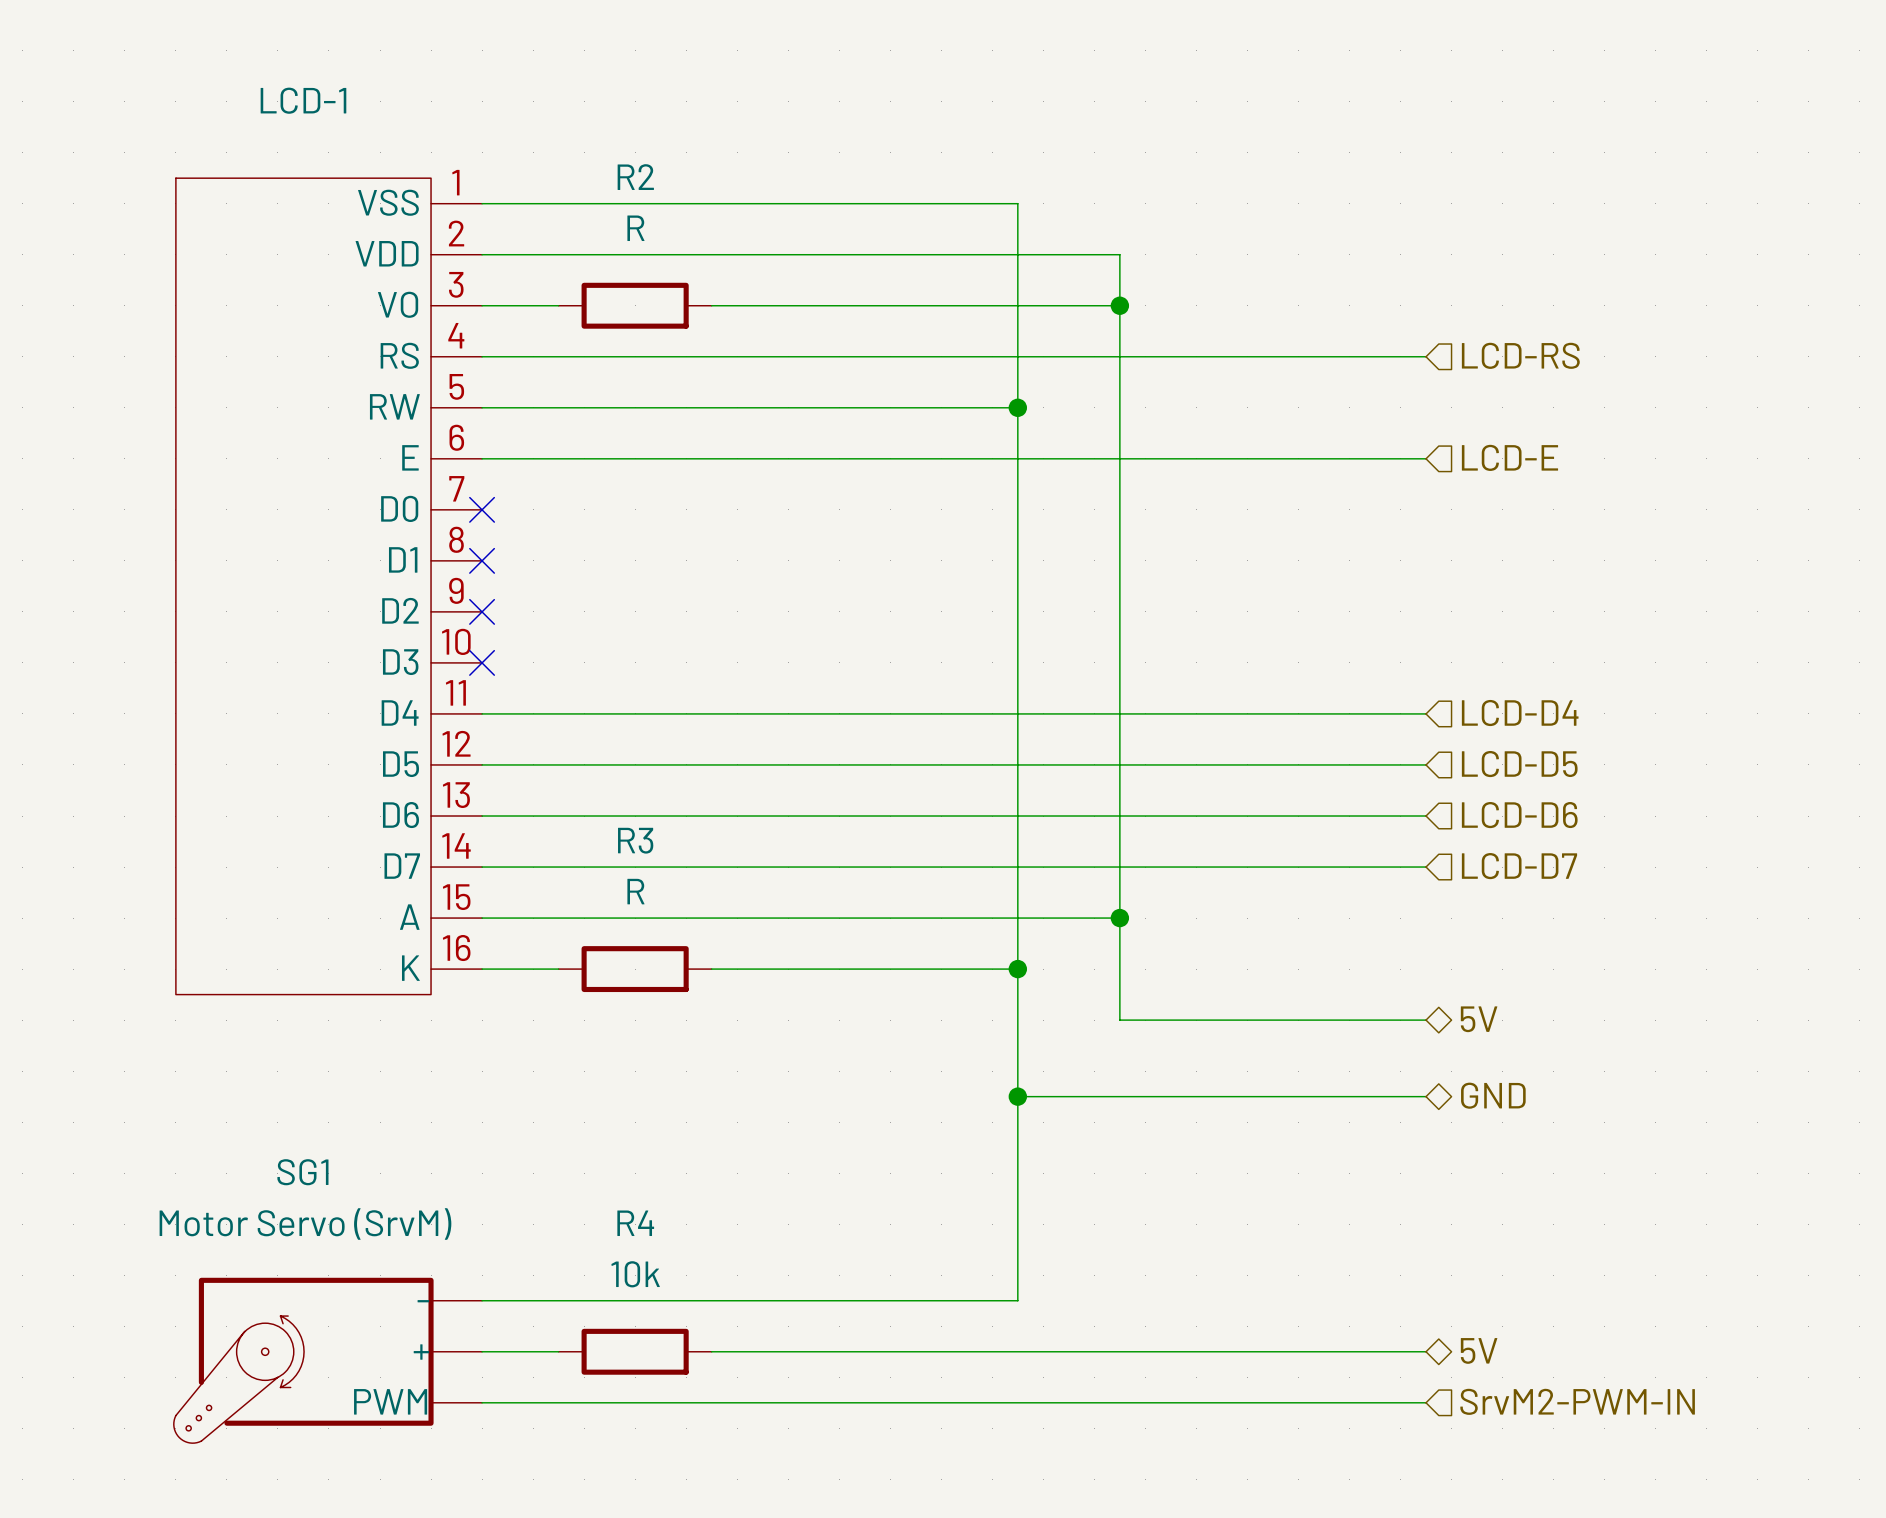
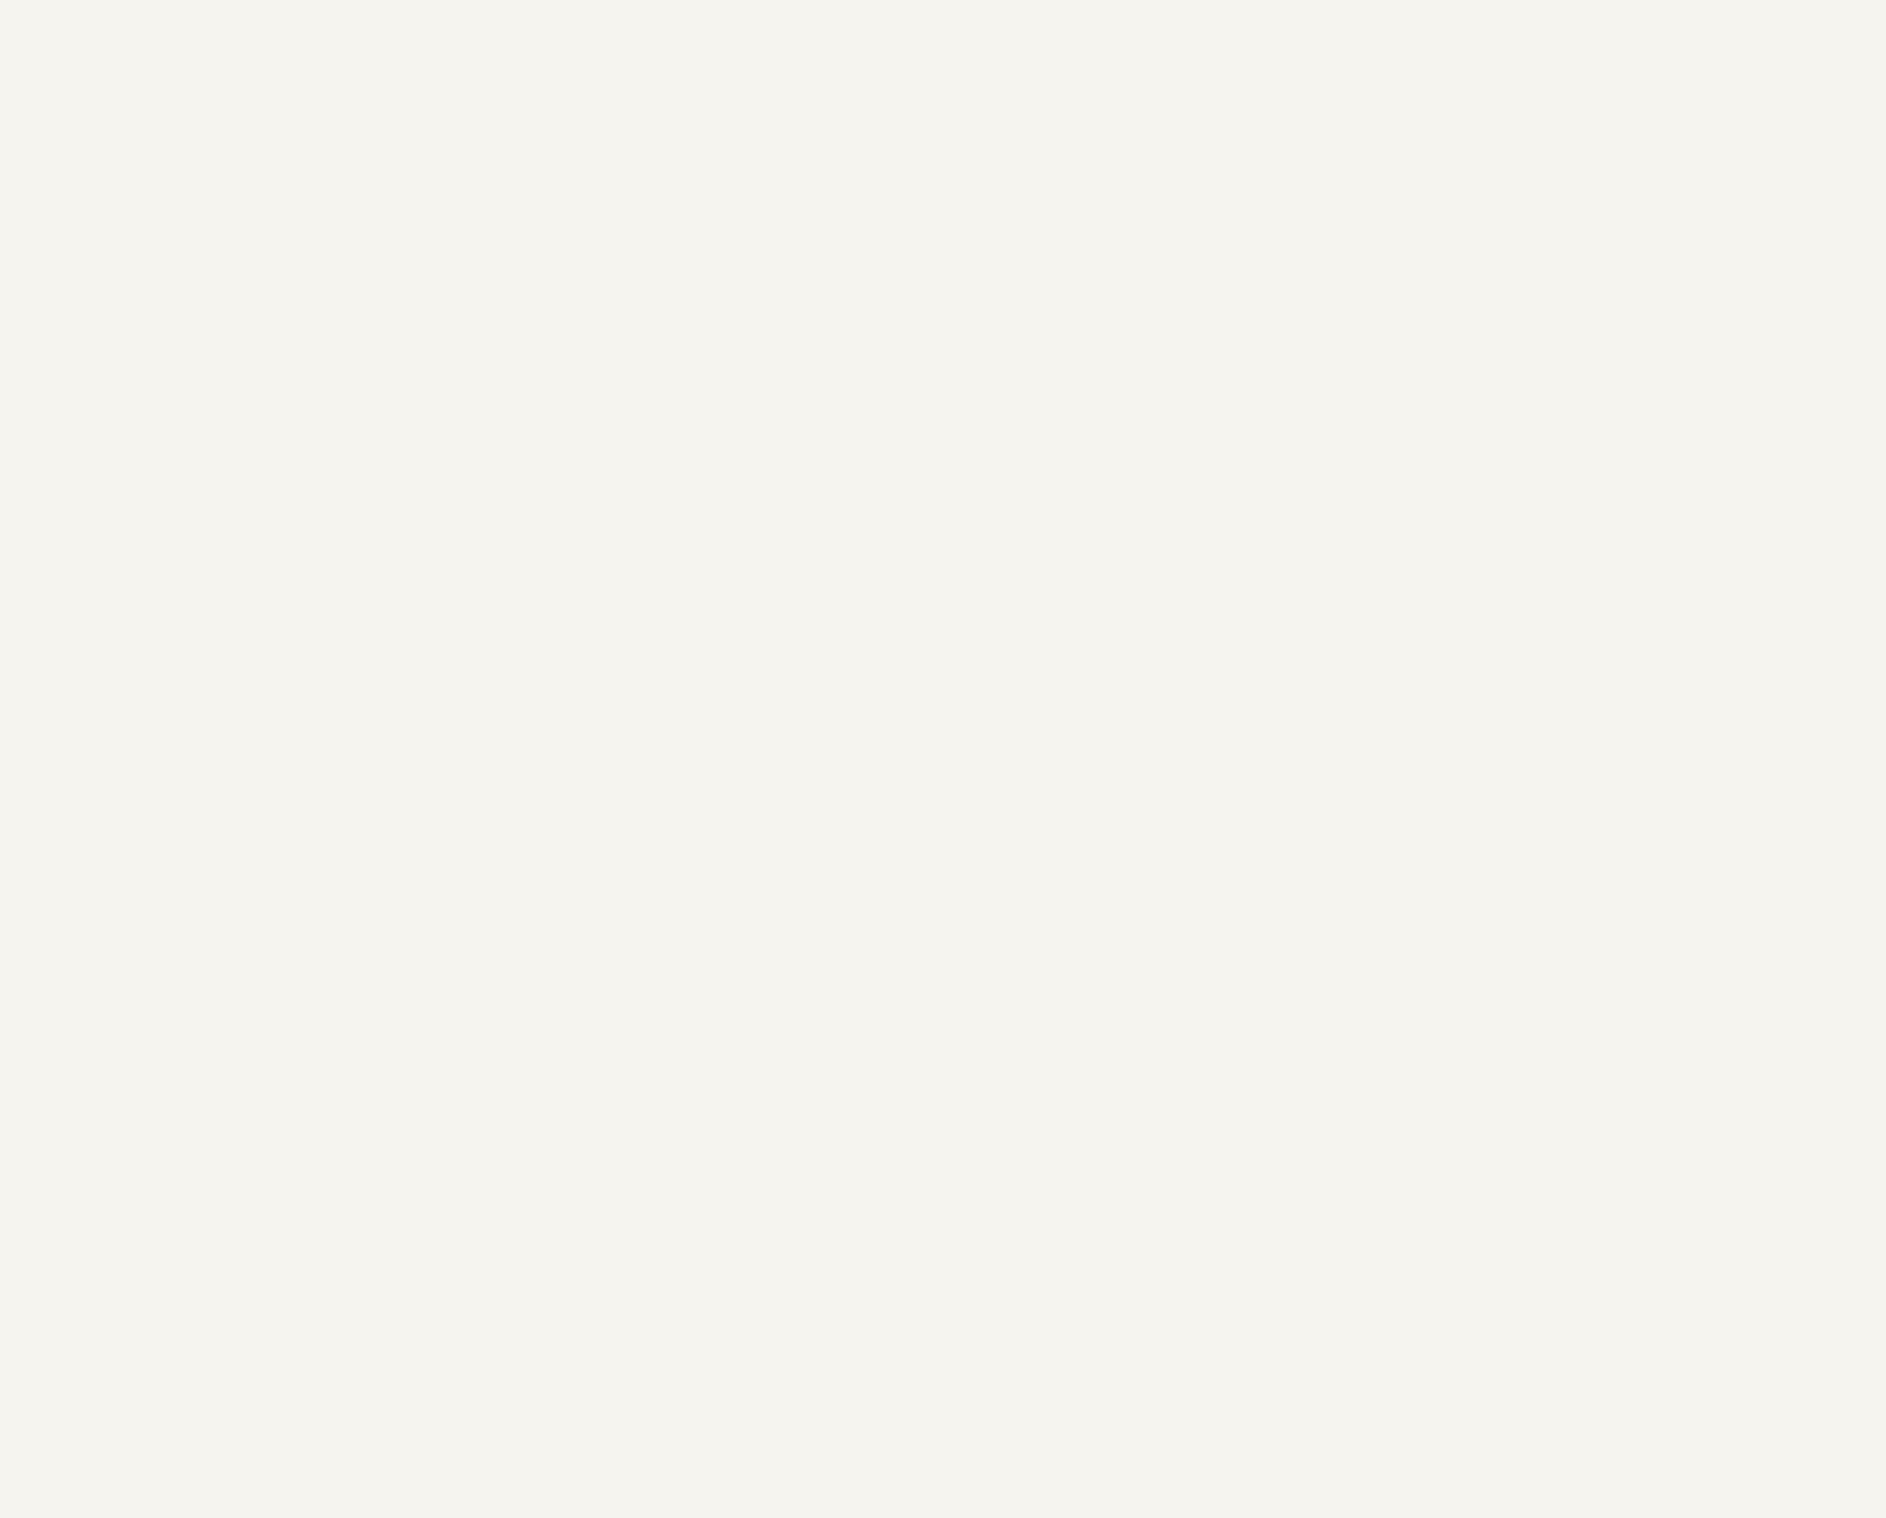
wire: (482, 203) (1017, 203) (1017, 1300) (482, 1300) -> none
wire: (482, 254) (1119, 254) (1119, 1020) (1426, 1020) -> none
wire: (482, 305) (558, 305) -> none
R2: R (635, 305) -> none
wire: (711, 305) (1119, 305) -> none
junction: (1119, 305) -> none
hierarchical label: LCD-RS (1520, 355) -> none
wire: (482, 356) (1426, 356) -> none
wire: (482, 407) (1017, 407) -> none
junction: (1017, 407) -> none
hierarchical label: LCD-E (1509, 457) -> none
wire: (482, 458) (1426, 458) -> none
no-connect mark: (482, 509) -> none
no-connect mark: (482, 560) -> none
LCD-1: (328, 586) -> none
no-connect mark: (482, 611) -> none
no-connect mark: (482, 662) -> none
wire: (482, 713) (1426, 713) -> none
hierarchical label: LCD-D4 (1520, 713) -> none
wire: (482, 764) (1426, 764) -> none
hierarchical label: LCD-D5 (1519, 764) -> none
hierarchical label: LCD-D6 (1519, 815) -> none
wire: (482, 816) (1426, 816) -> none
hierarchical label: LCD-D7 (1519, 866) -> none
wire: (482, 867) (1426, 867) -> none
wire: (482, 918) (1119, 918) -> none
junction: (1119, 918) -> none
wire: (482, 969) (558, 969) -> none
R3: R (635, 969) -> none
wire: (711, 969) (1017, 969) -> none
junction: (1017, 969) -> none
hierarchical label: 5V (1479, 1019) -> none
hierarchical label: GND (1493, 1095) -> none
wire: (1017, 1096) (1426, 1096) -> none
junction: (1017, 1096) -> none
hierarchical label: 5V (1479, 1350) -> none
wire: (482, 1351) (558, 1351) -> none
R4: 10k (635, 1351) -> none
wire: (711, 1351) (1426, 1351) -> none
SG1: Motor Servo (SrvM) (327, 1360) -> none
hierarchical label: SrvM2-PWM-IN (1577, 1401) -> none
wire: (482, 1402) (1426, 1402) -> none

